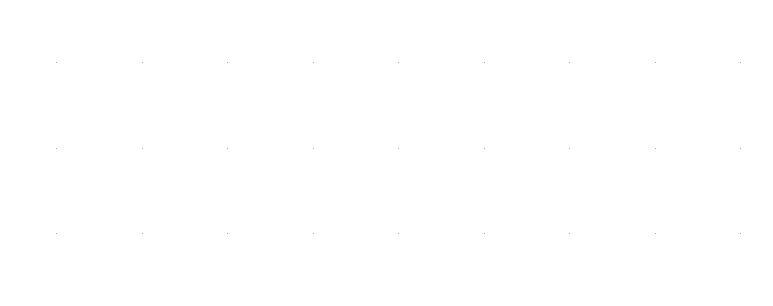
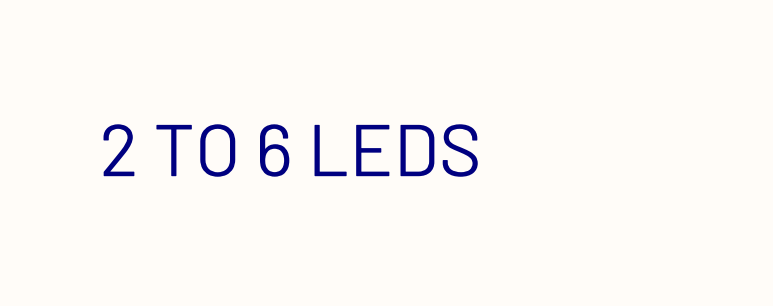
text: none -> 2 TO 6 LEDS (290, 150)

